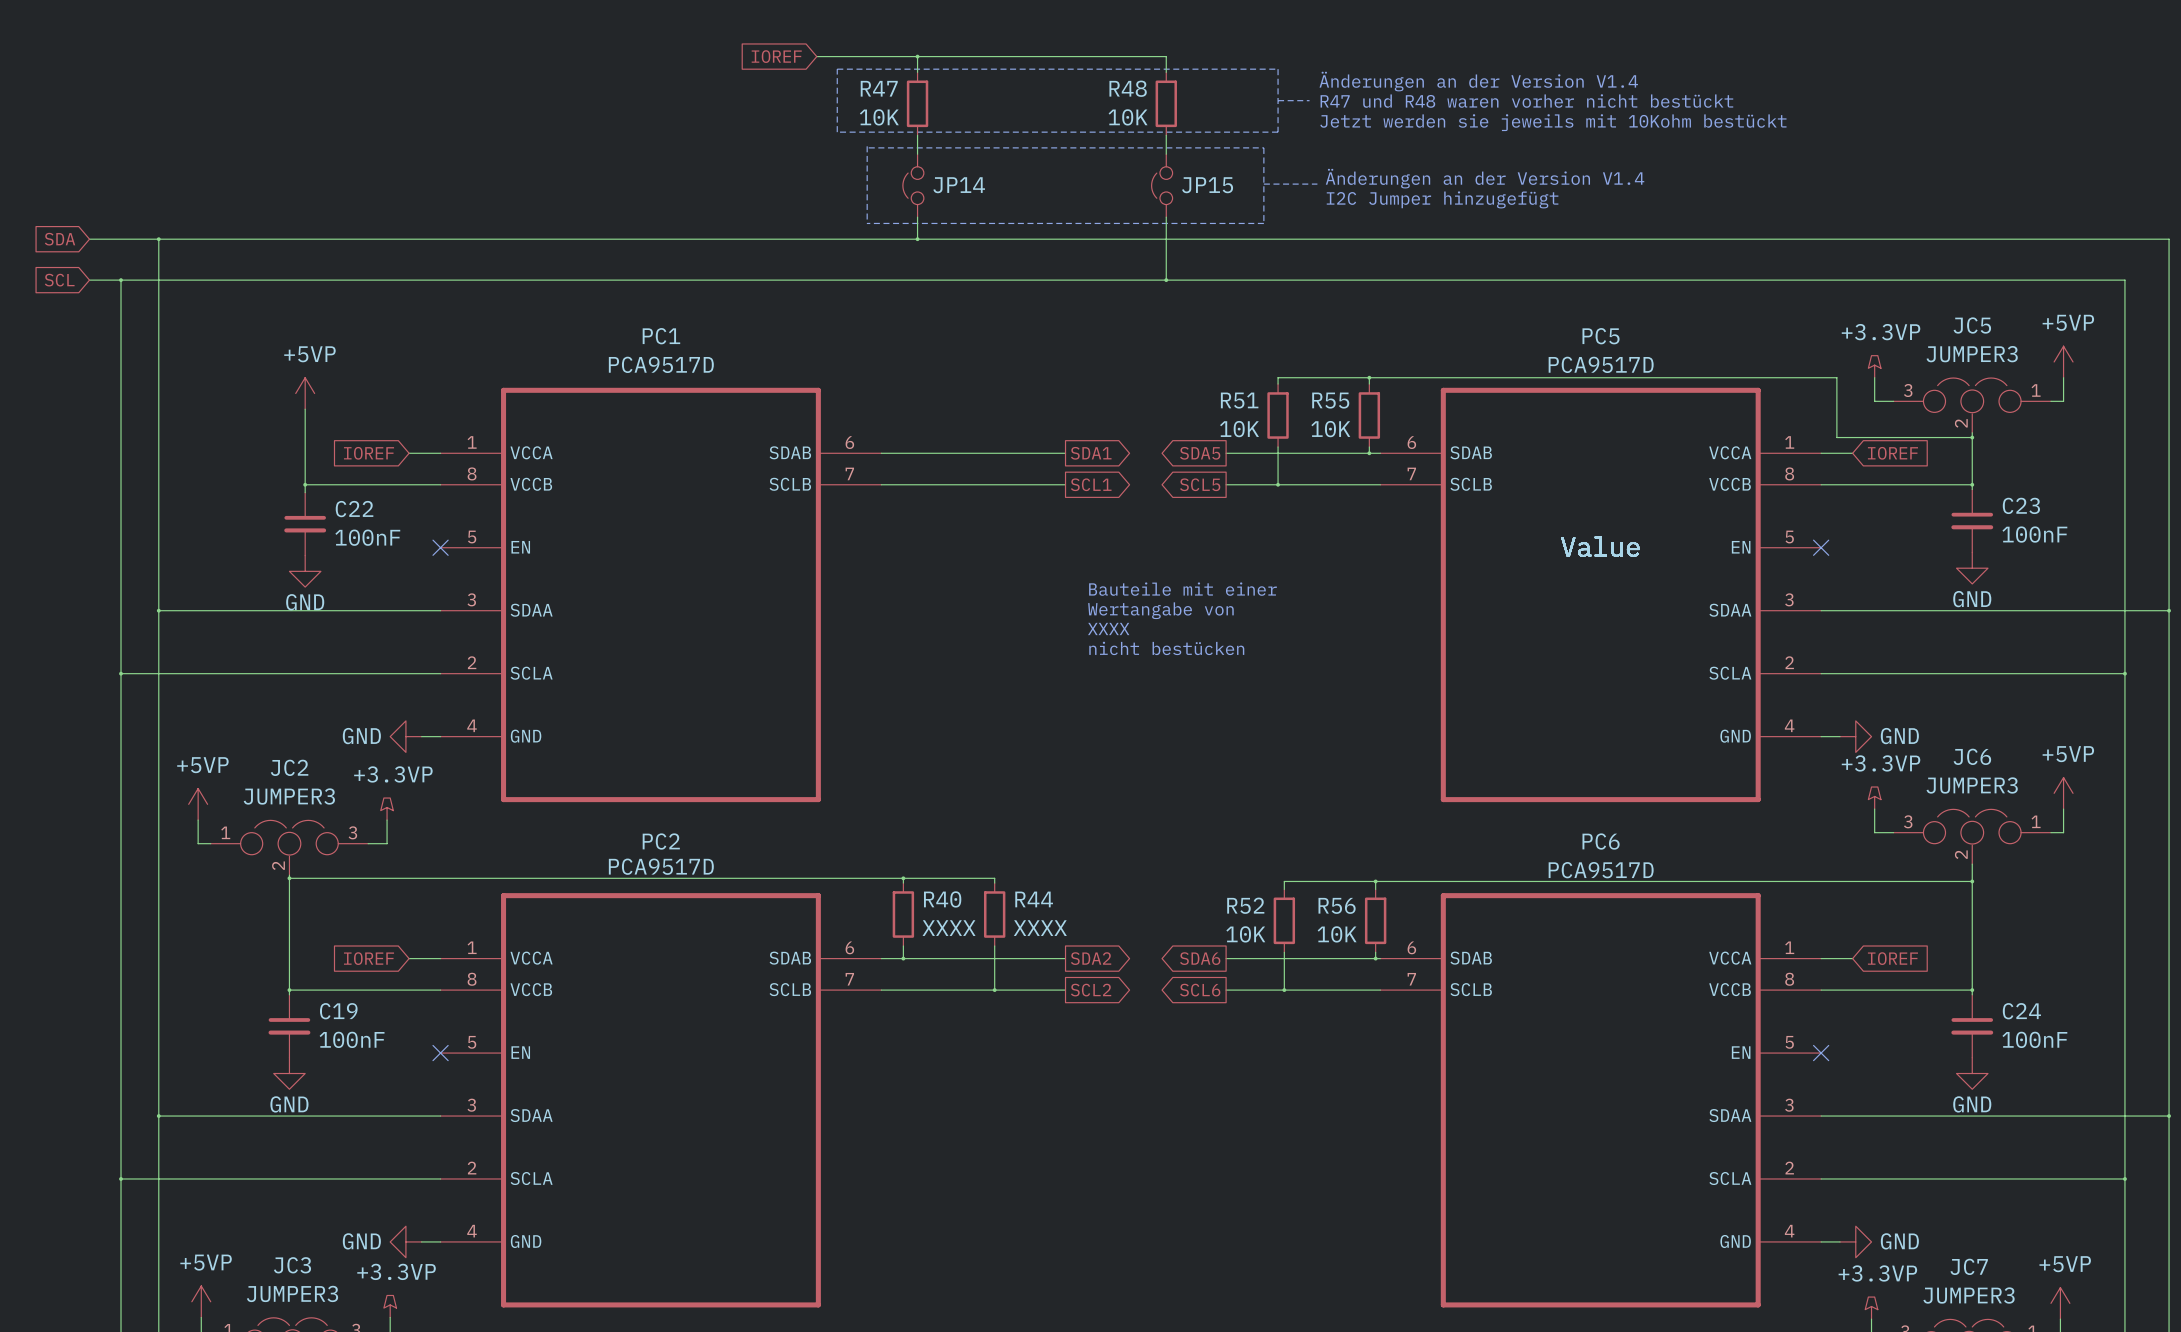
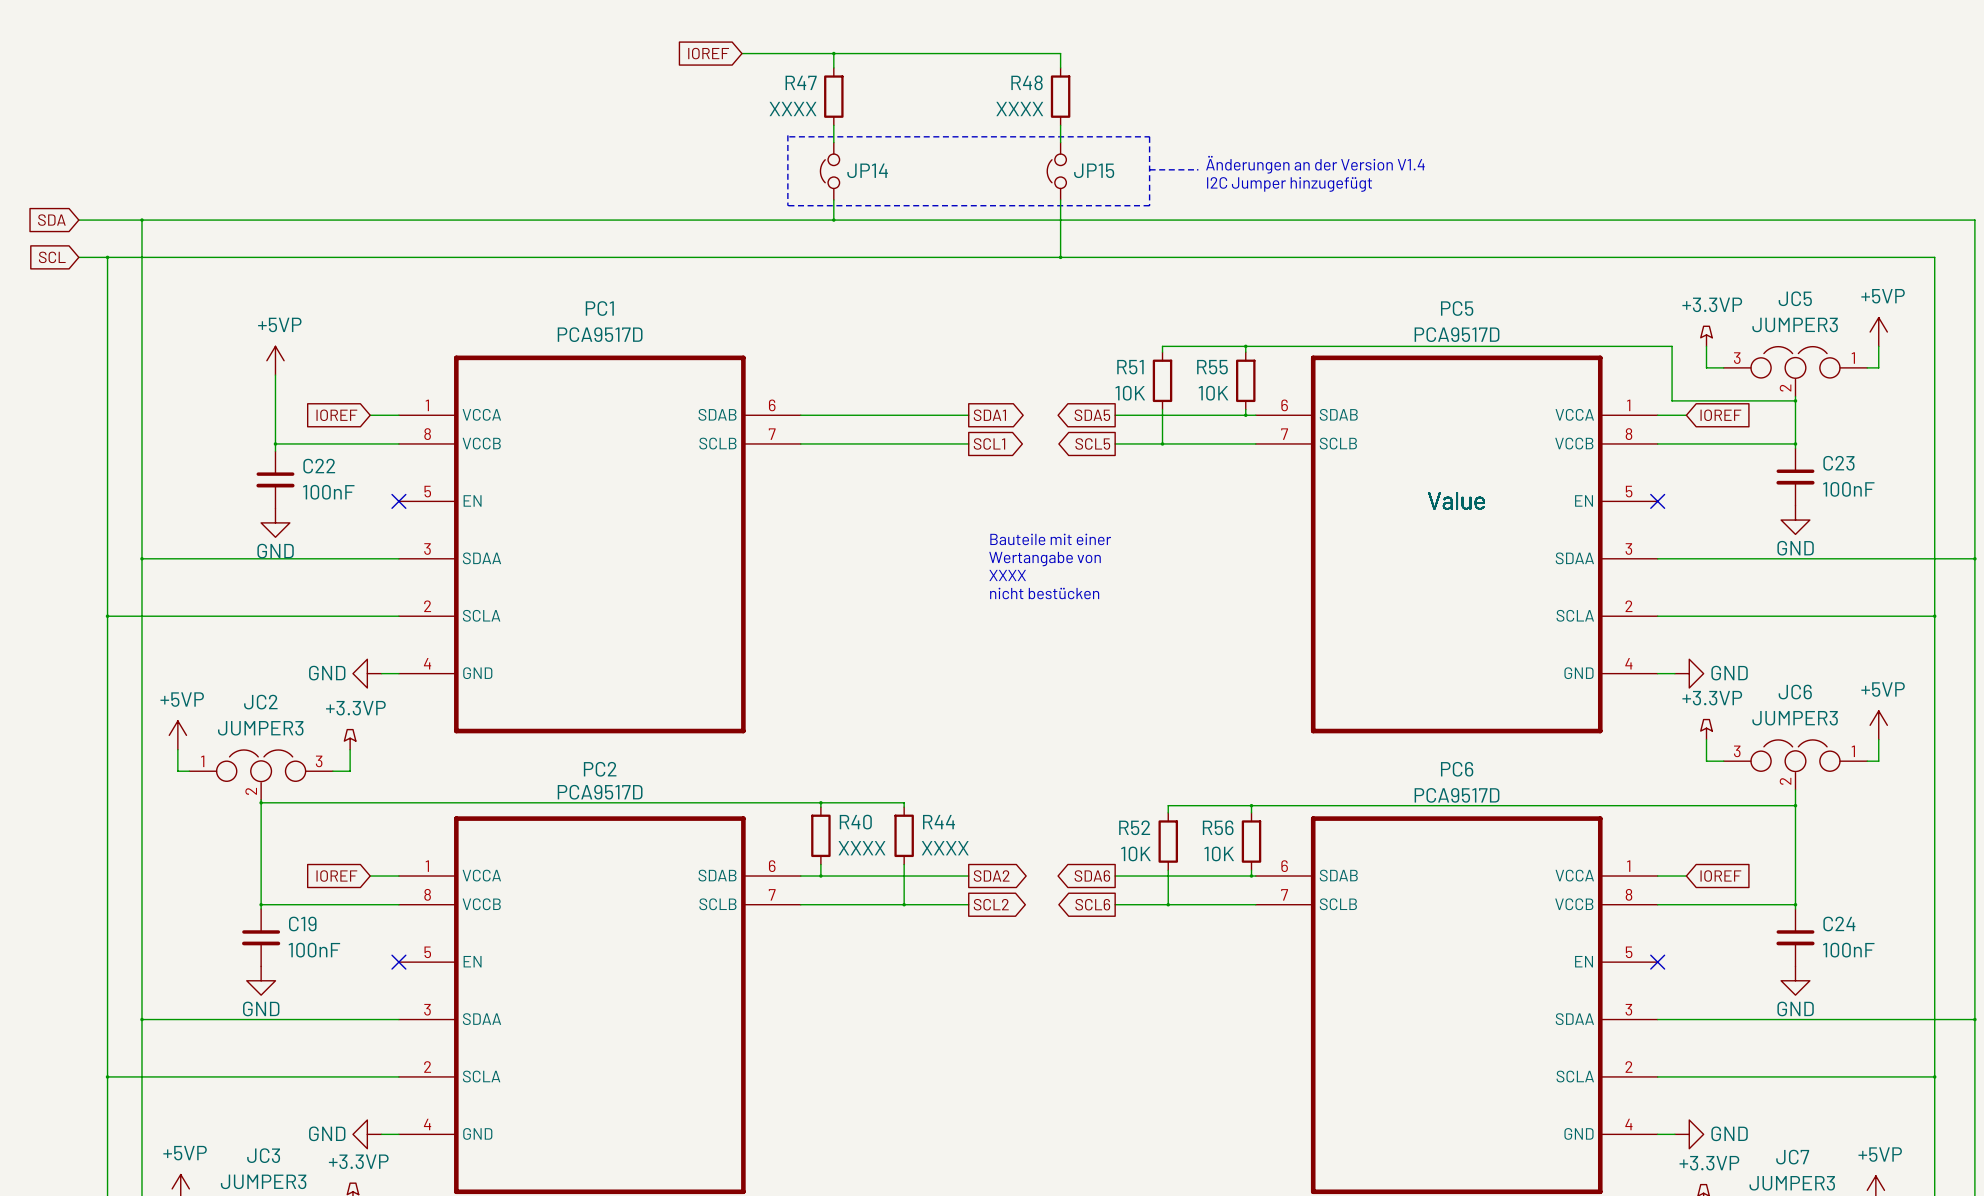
line: (837, 69) (1278, 69) (1278, 132) (837, 132) (837, 69) -> none
text: Änderungen an der Version V1.4 (1478, 81) -> none
line: (1278, 100) (1309, 100) -> none
text: R47 und R48 waren vorher nicht bestückt (1526, 101) -> none
R47 value: 10K (879, 117) -> XXXX (793, 109)
R48 value: 10K (1128, 117) -> XXXX (1019, 109)
text: Jetzt werden sie jeweils mit 10Kohm bestückt (1553, 122) -> none

